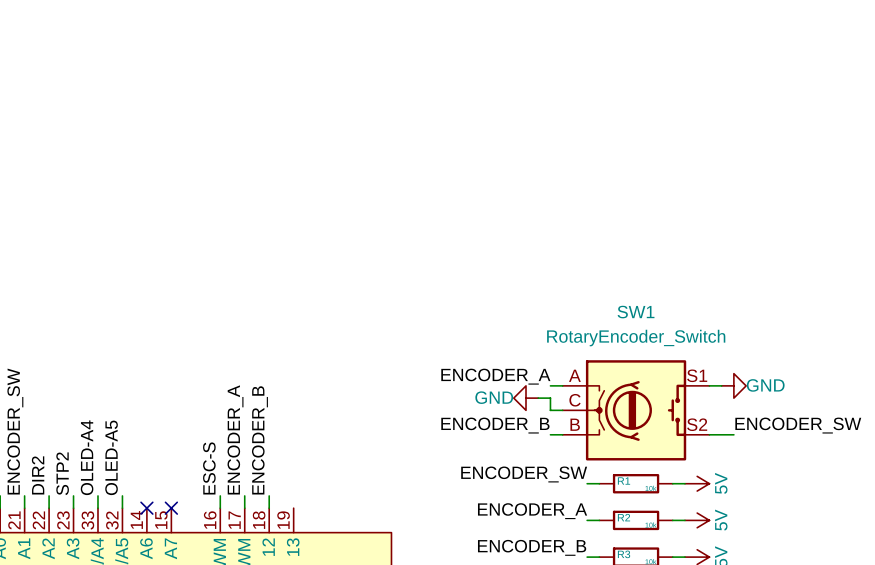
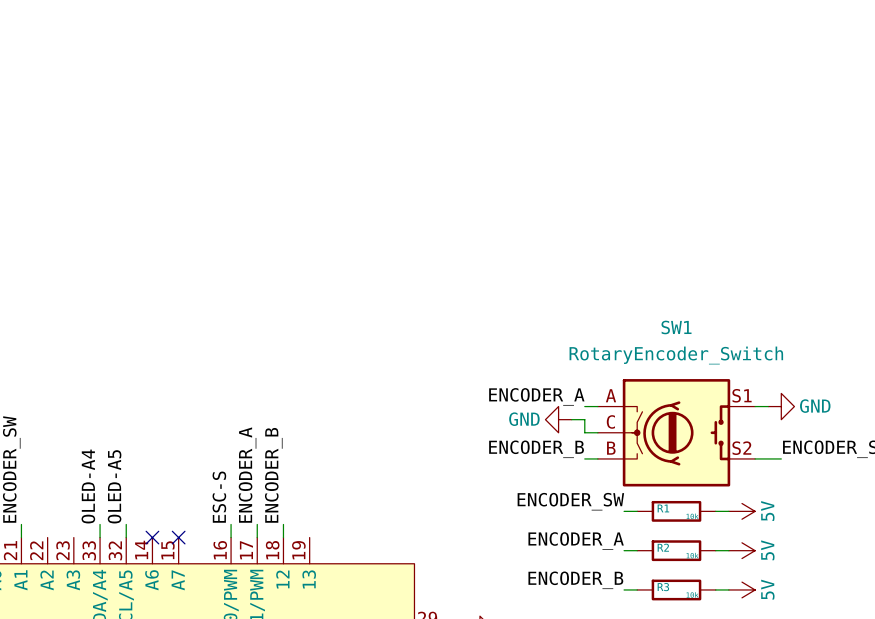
label: STP2 (62, 473) -> none
label: DIR2 (38, 475) -> none
wire: (49, 495) (49, 508) -> none
wire: (73, 495) (73, 508) -> none

